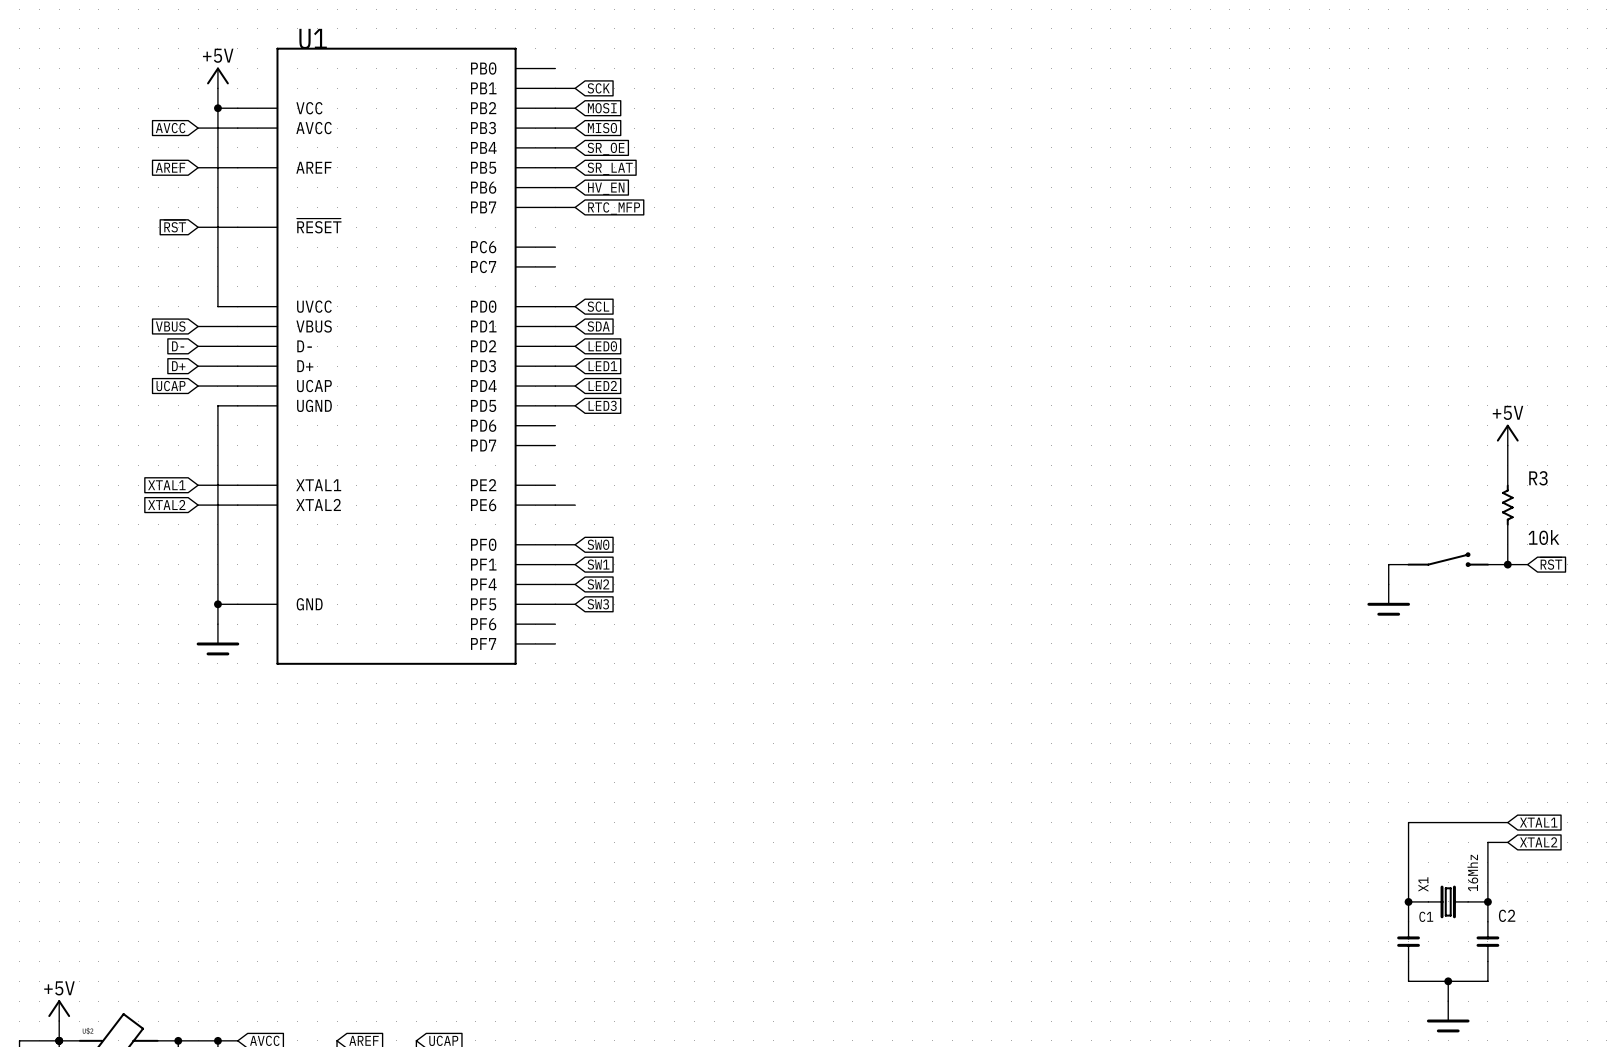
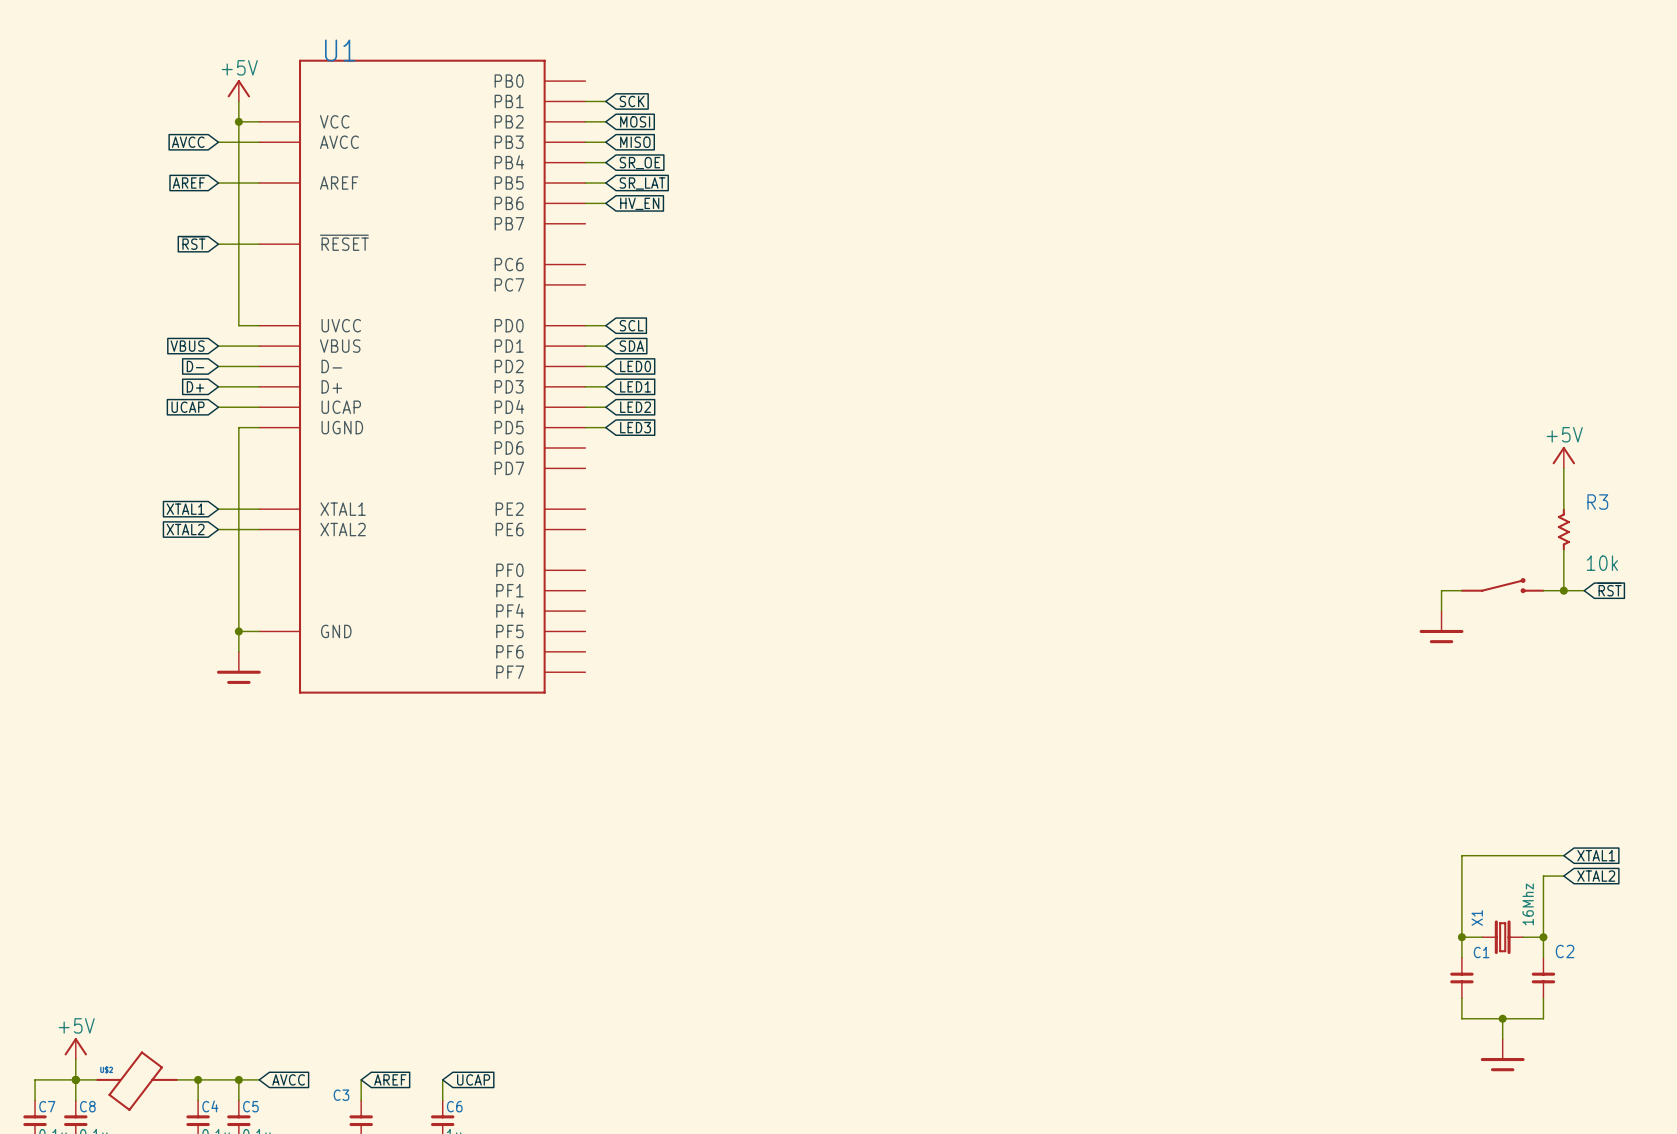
wire: (555, 207) (575, 207) -> none
global label: RTC_MFP (614, 208) -> none
wire: (555, 505) (575, 505) -> none
wire: (555, 544) (575, 544) -> none
global label: SW0 (598, 544) -> none
wire: (555, 564) (575, 564) -> none
global label: SW1 (598, 564) -> none
wire: (555, 584) (575, 584) -> none
global label: SW2 (598, 584) -> none
wire: (555, 604) (575, 604) -> none
global label: SW3 (598, 604) -> none

